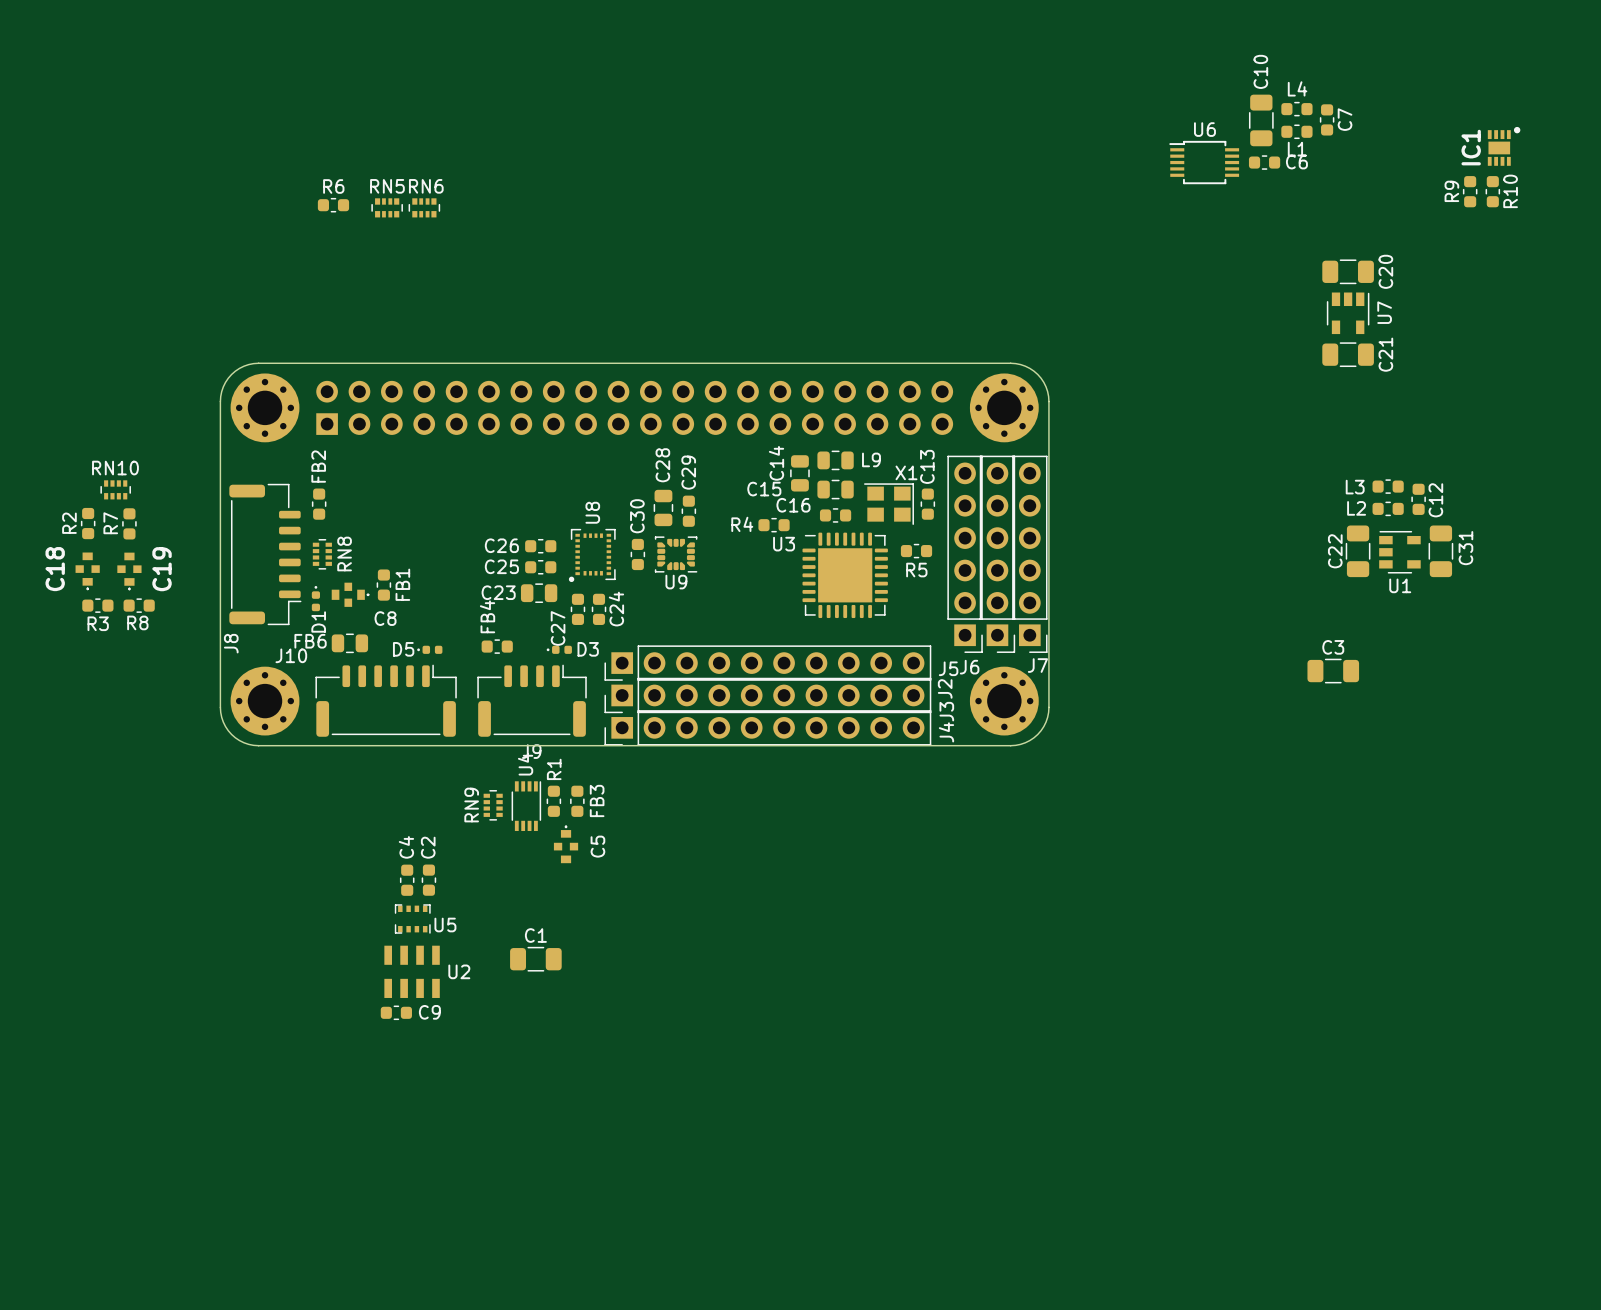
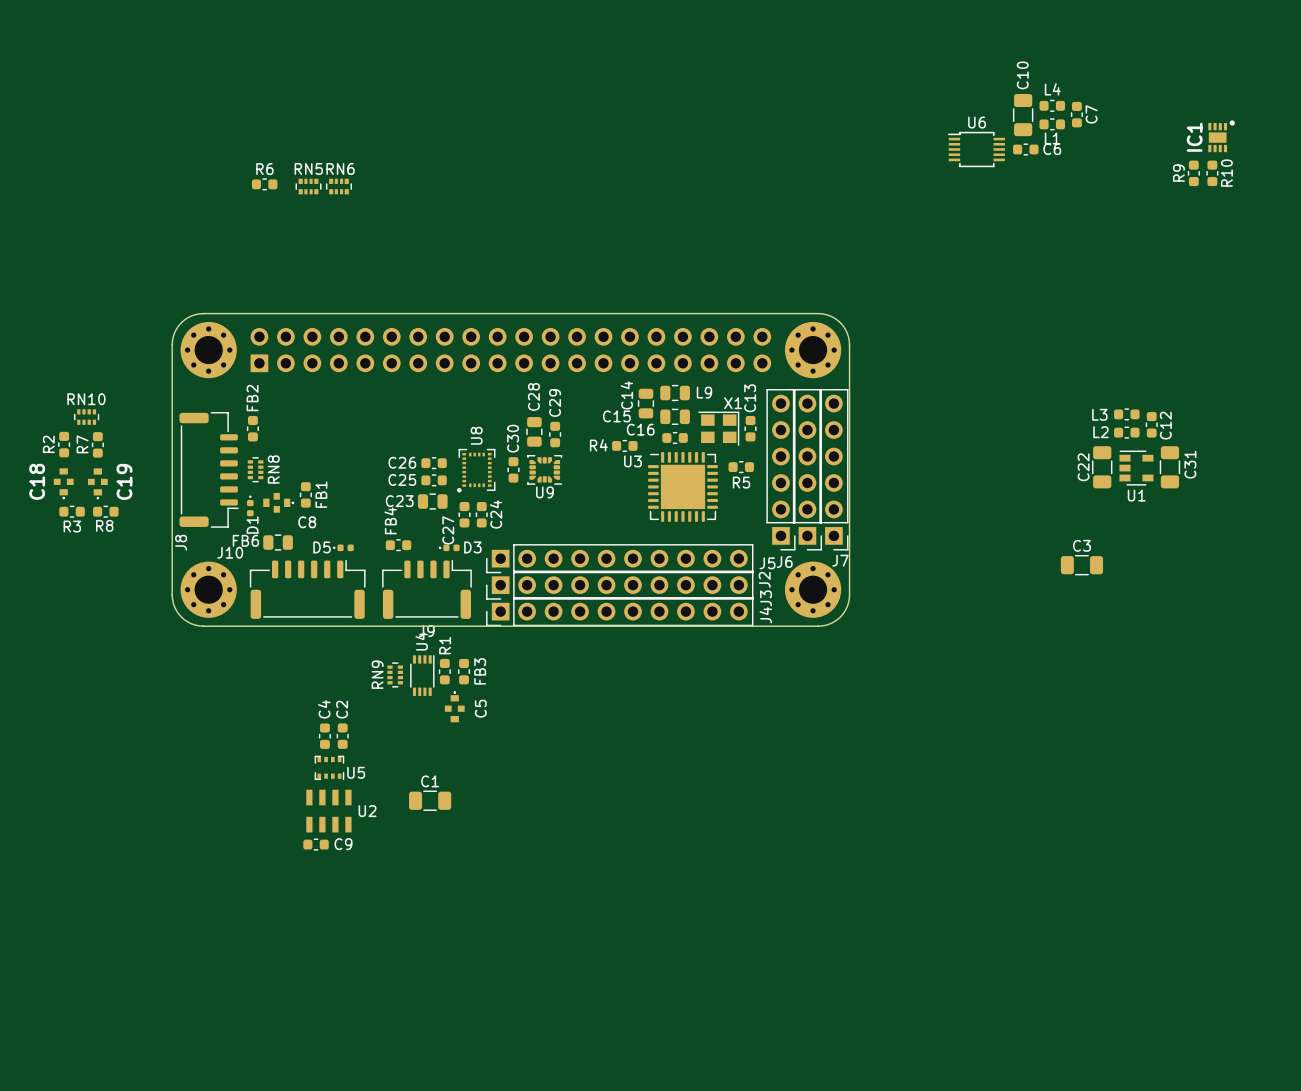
C20: (1348, 271) -> none
U7: (1348, 313) -> none
C21: (1348, 354) -> none

